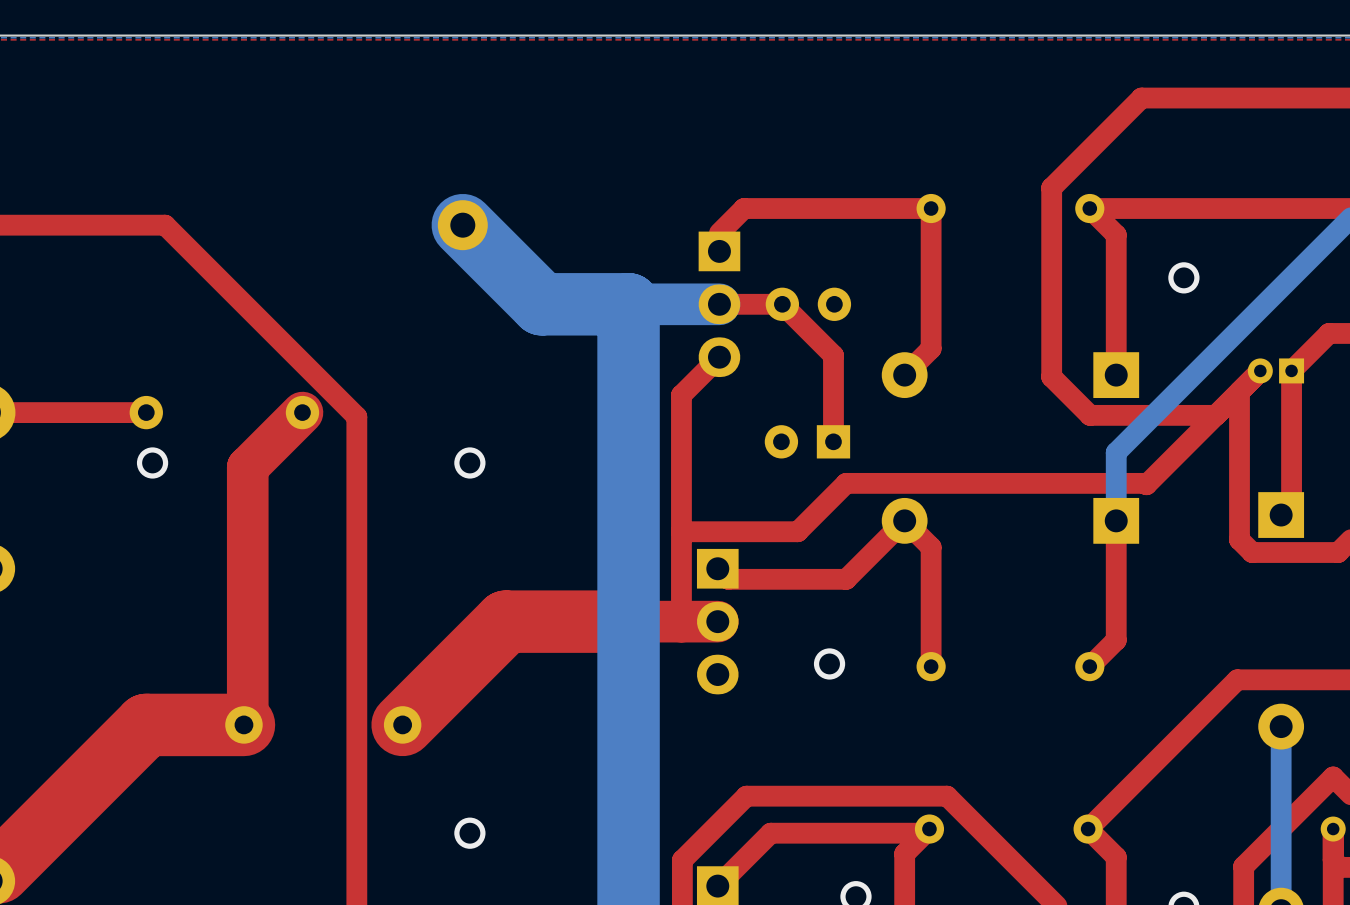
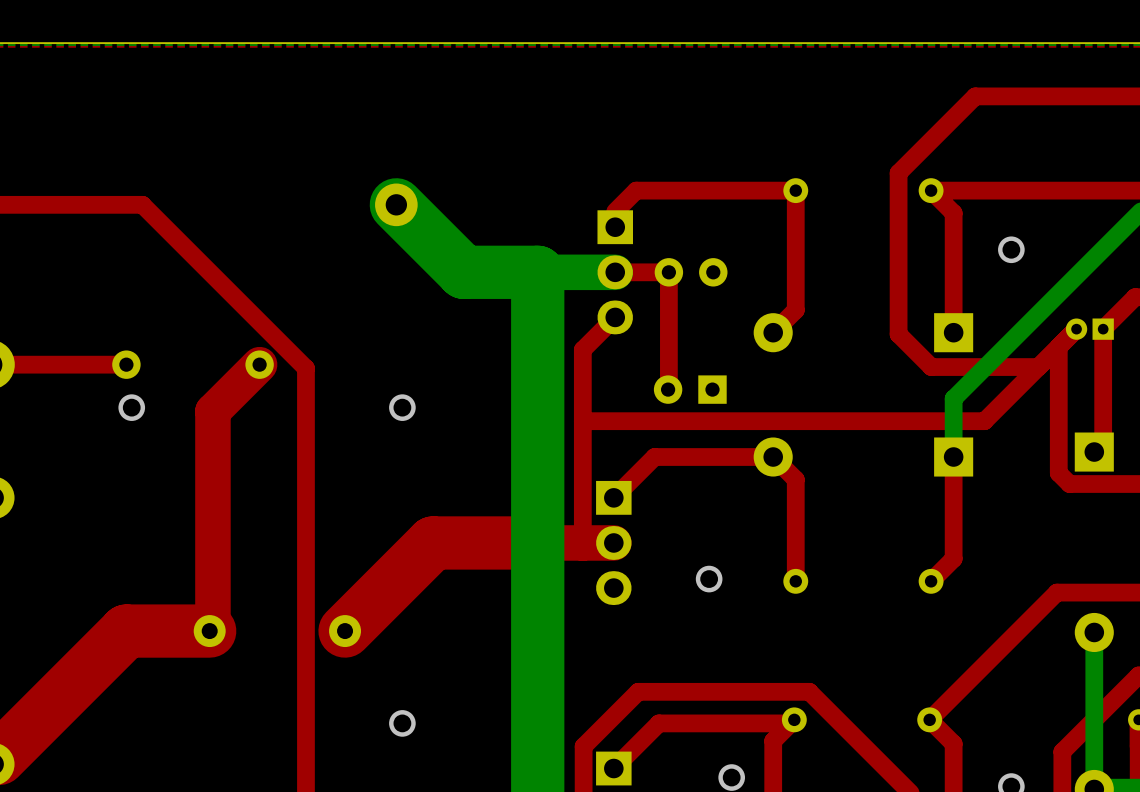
top track: (782, 304) (833, 355) (833, 441) -> (668, 272) (668, 389)
top track: (1152, 478) (1146, 484) (846, 483) (797, 531) (681, 531) -> (984, 421) (582, 421)
top track: (904, 520) (846, 579) (728, 579) (717, 568) -> (773, 457) (654, 457) (613, 497)

